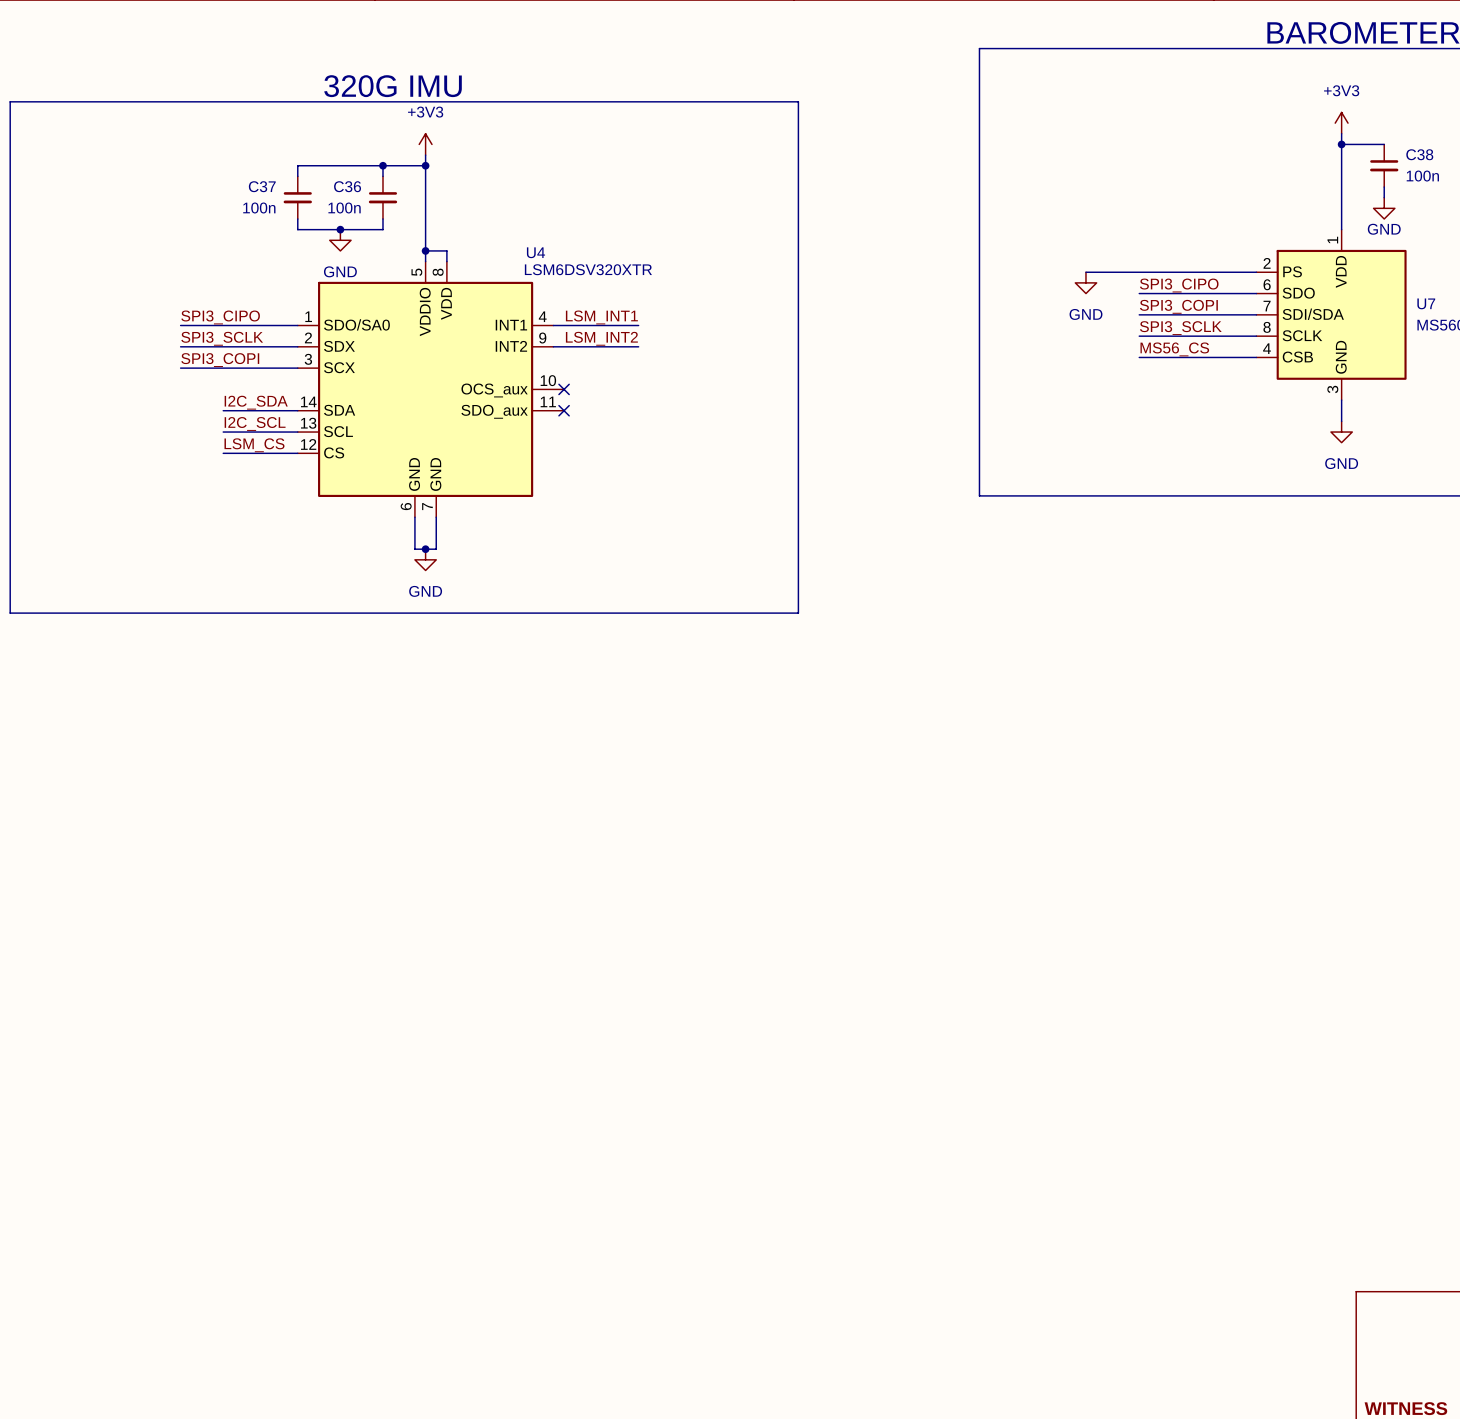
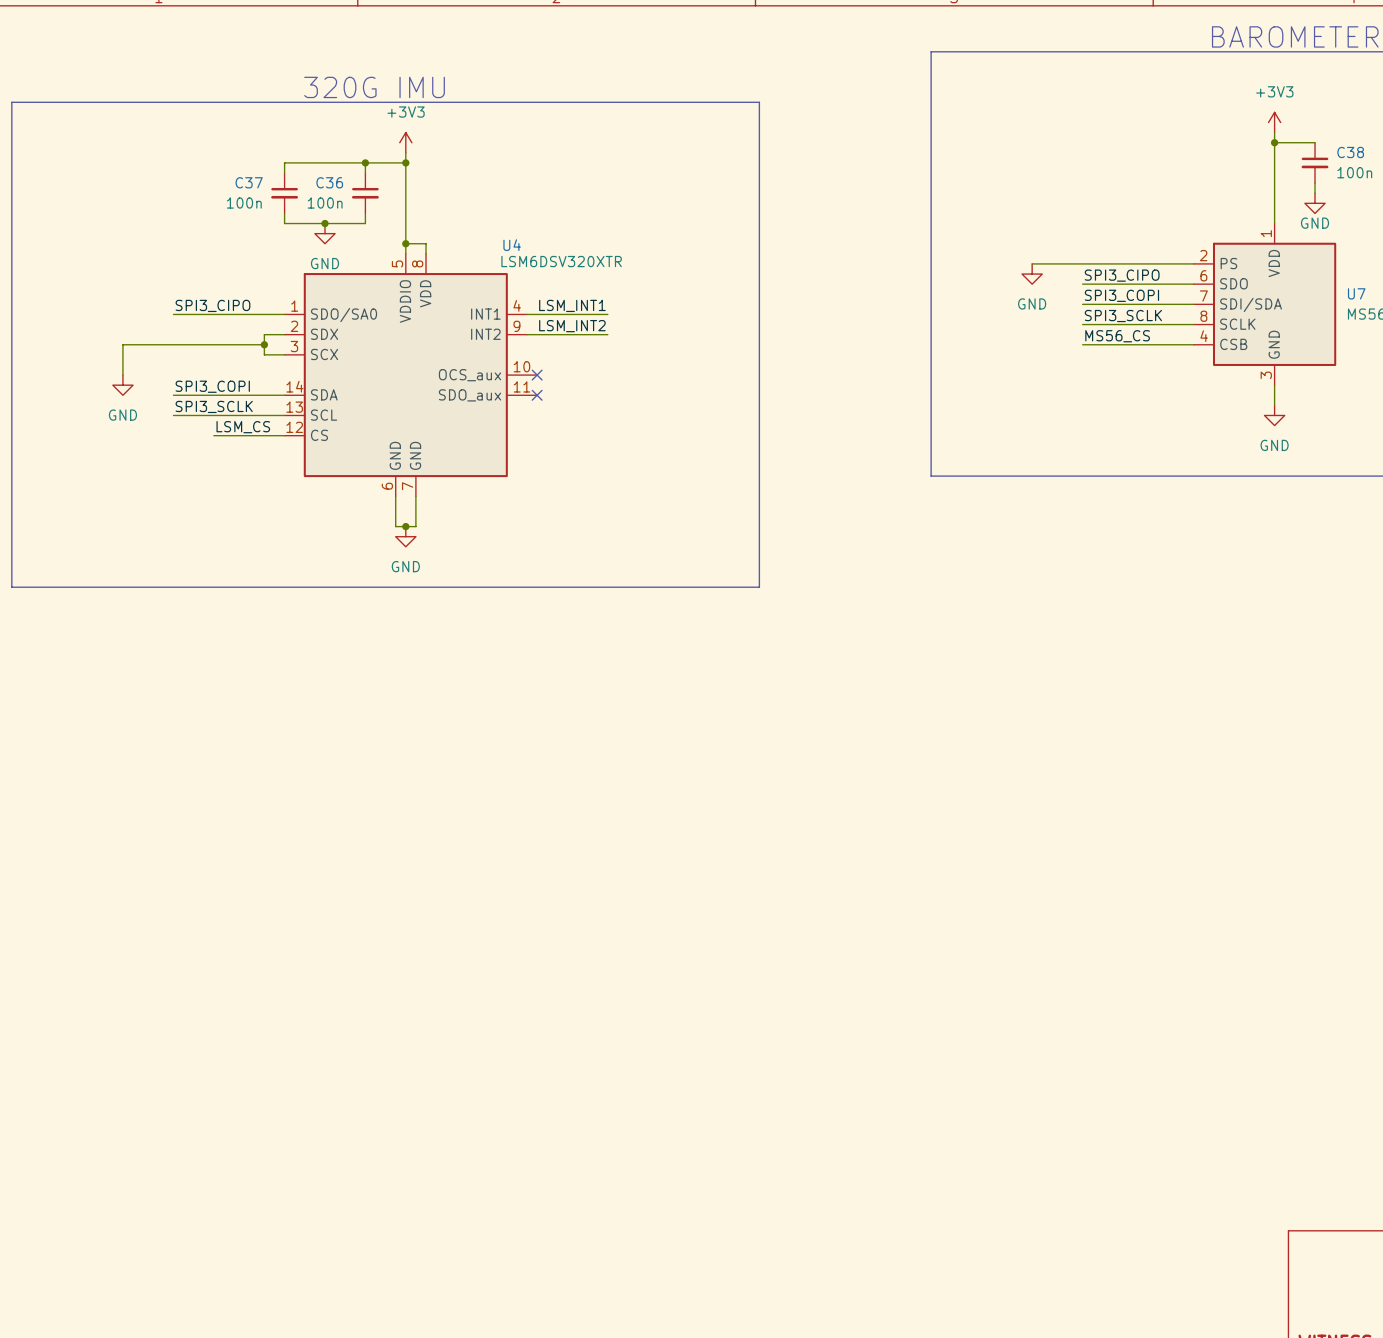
label position: SPI3_SCLK (222, 338) -> SPI3_SCLK (214, 406)
wire: (180, 346) (276, 346) -> (264, 354) (264, 334)
wire: none -> (264, 344) (122, 344) (122, 375)
junction: none -> (264, 344)
label position: SPI3_COPI (220, 360) -> SPI3_COPI (212, 386)
wire: (180, 368) (276, 368) -> none
power symbol: none -> GND (122, 385)
label: I2C_SDA (256, 402) -> none
wire: none -> (173, 395) (213, 395)
label: I2C_SCL (255, 423) -> none
wire: none -> (173, 415) (213, 415)

